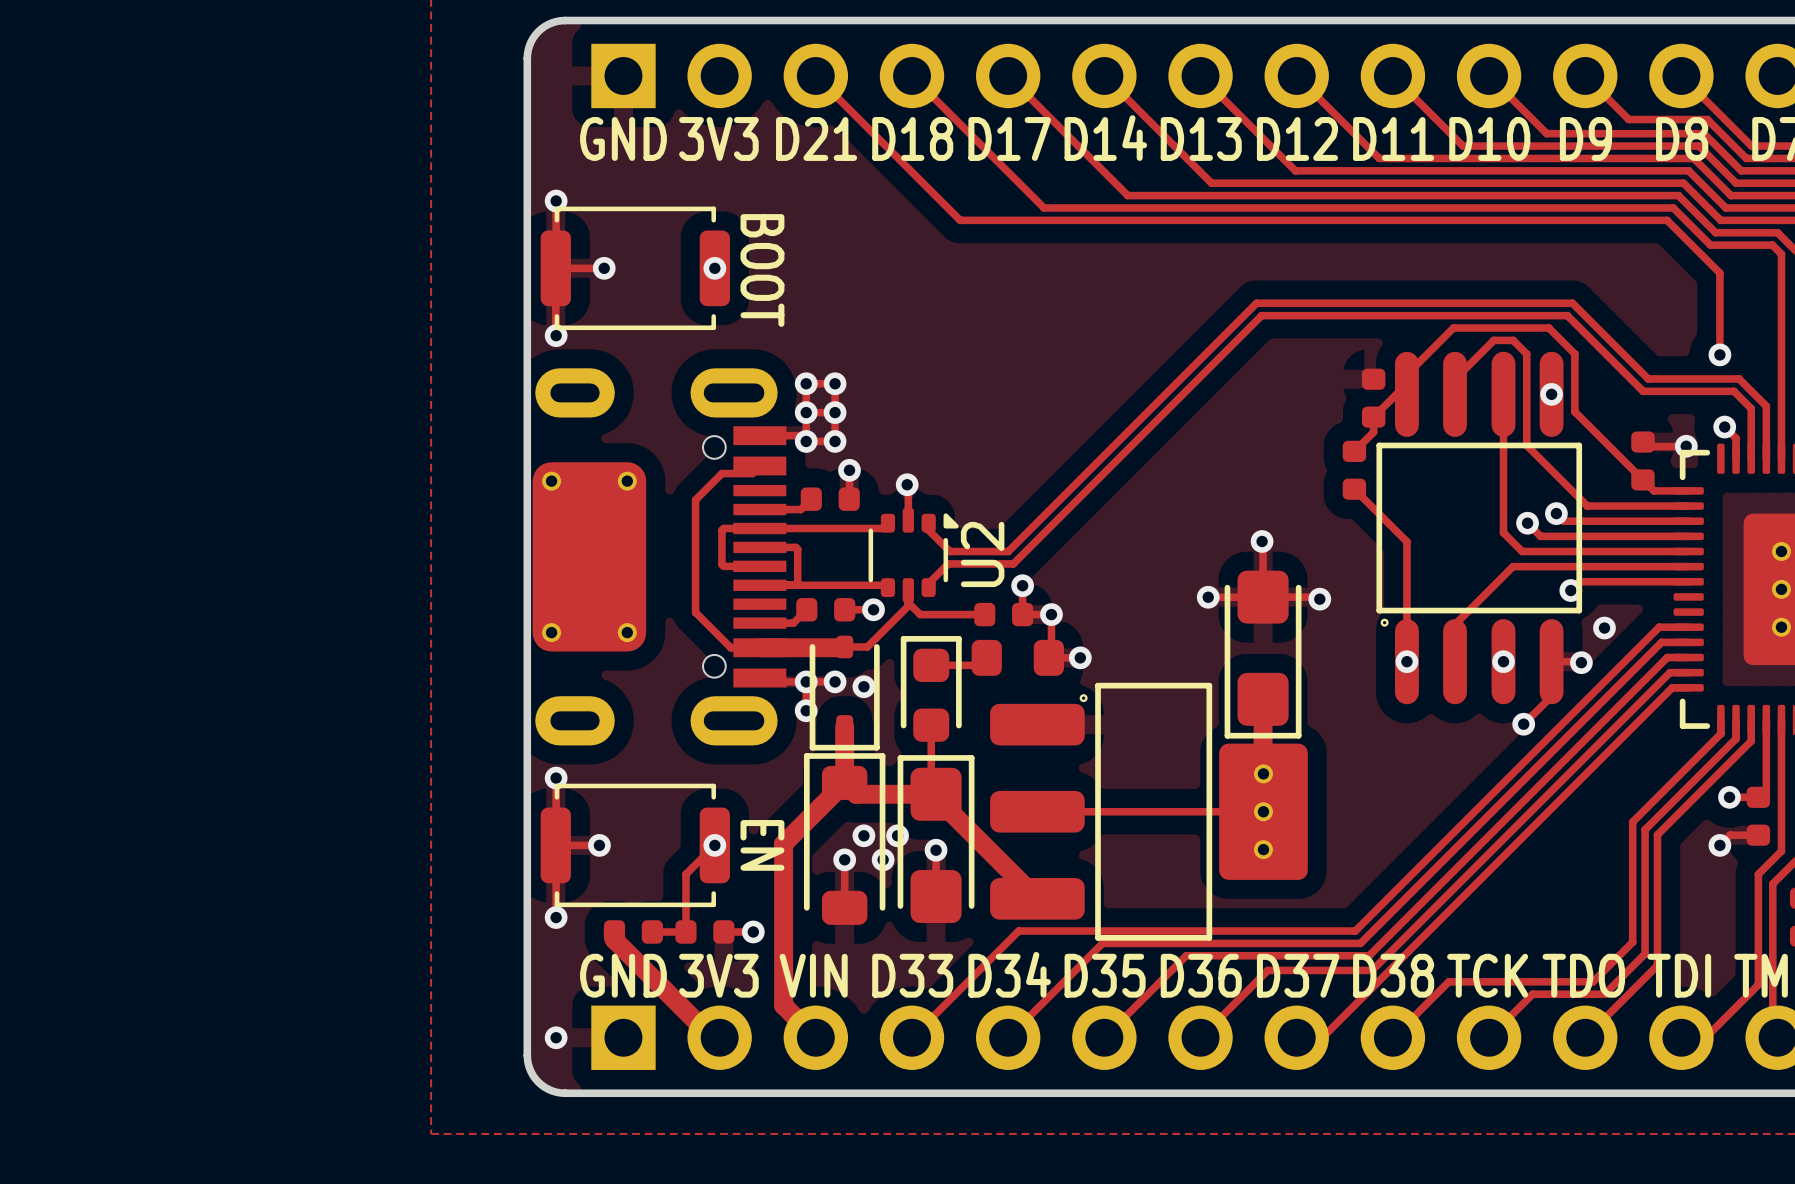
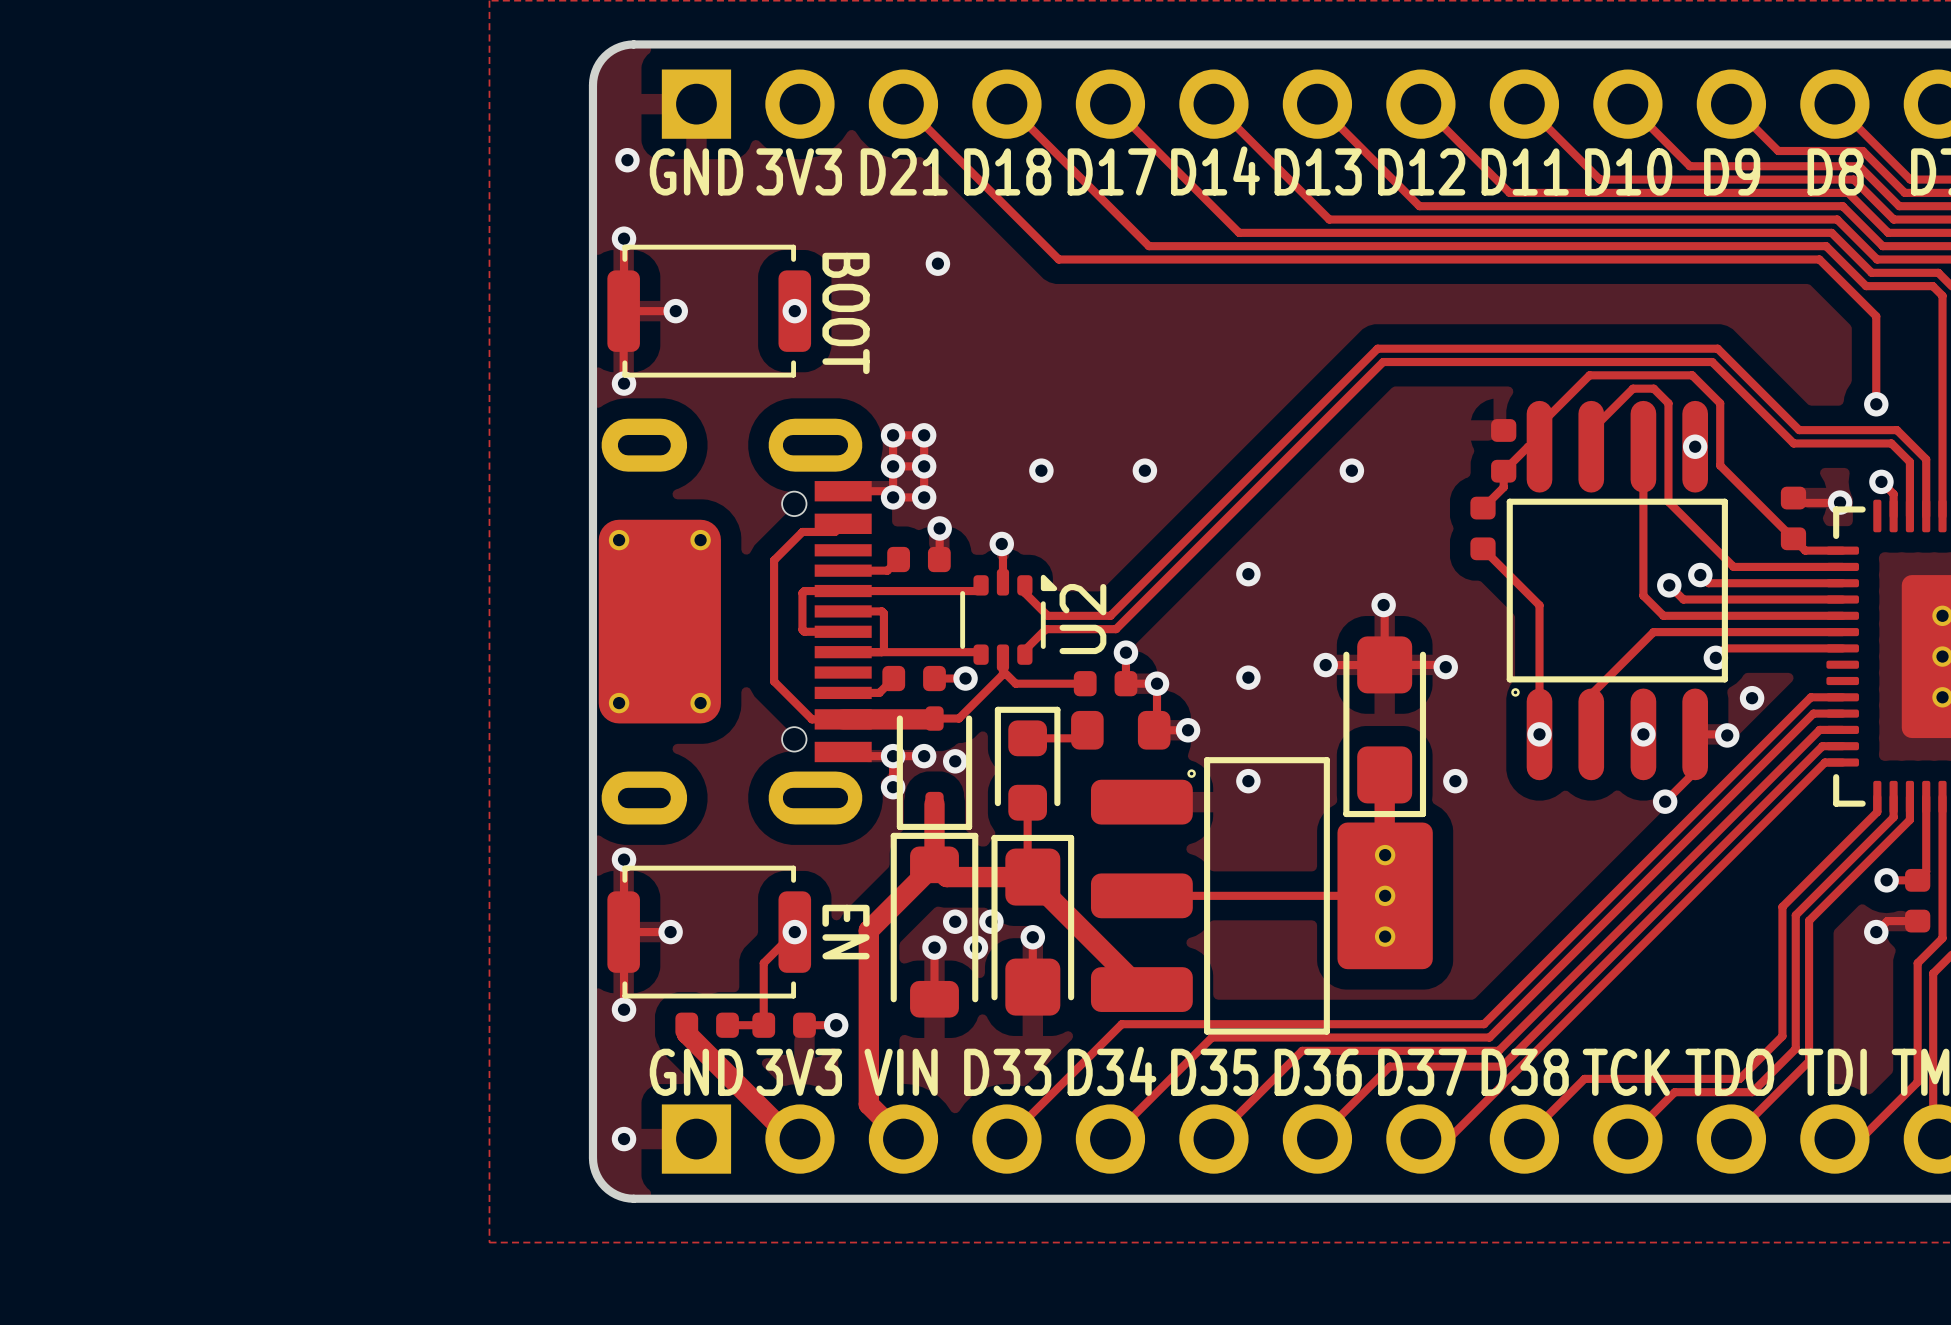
via: none -> (627, 160)
via: none -> (937, 263)
via: none -> (1041, 470)
via: none -> (1144, 470)
via: none -> (1351, 470)
via: none -> (1248, 574)
via: none -> (1248, 677)
via: none -> (1248, 781)
via: none -> (1455, 781)

